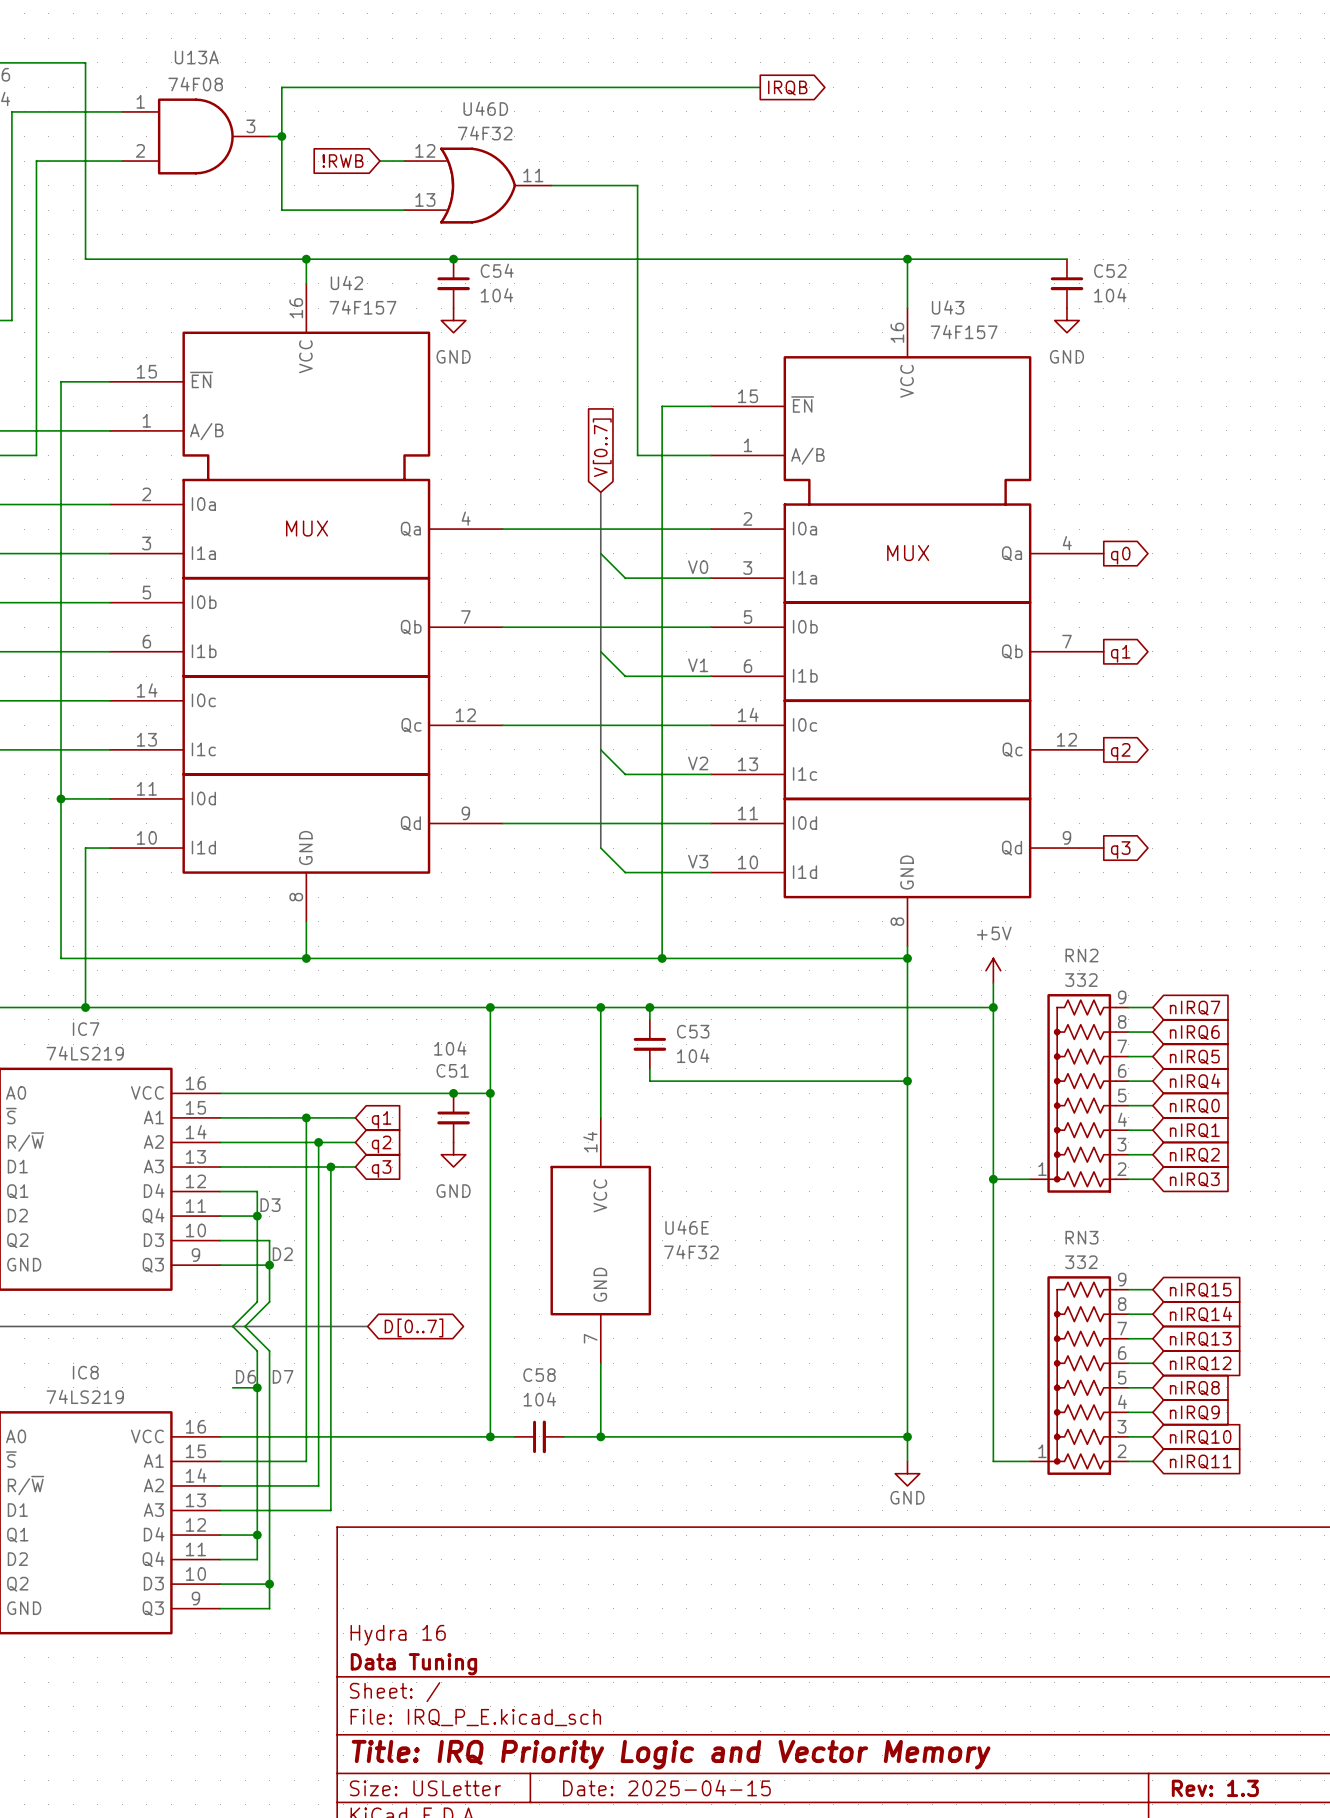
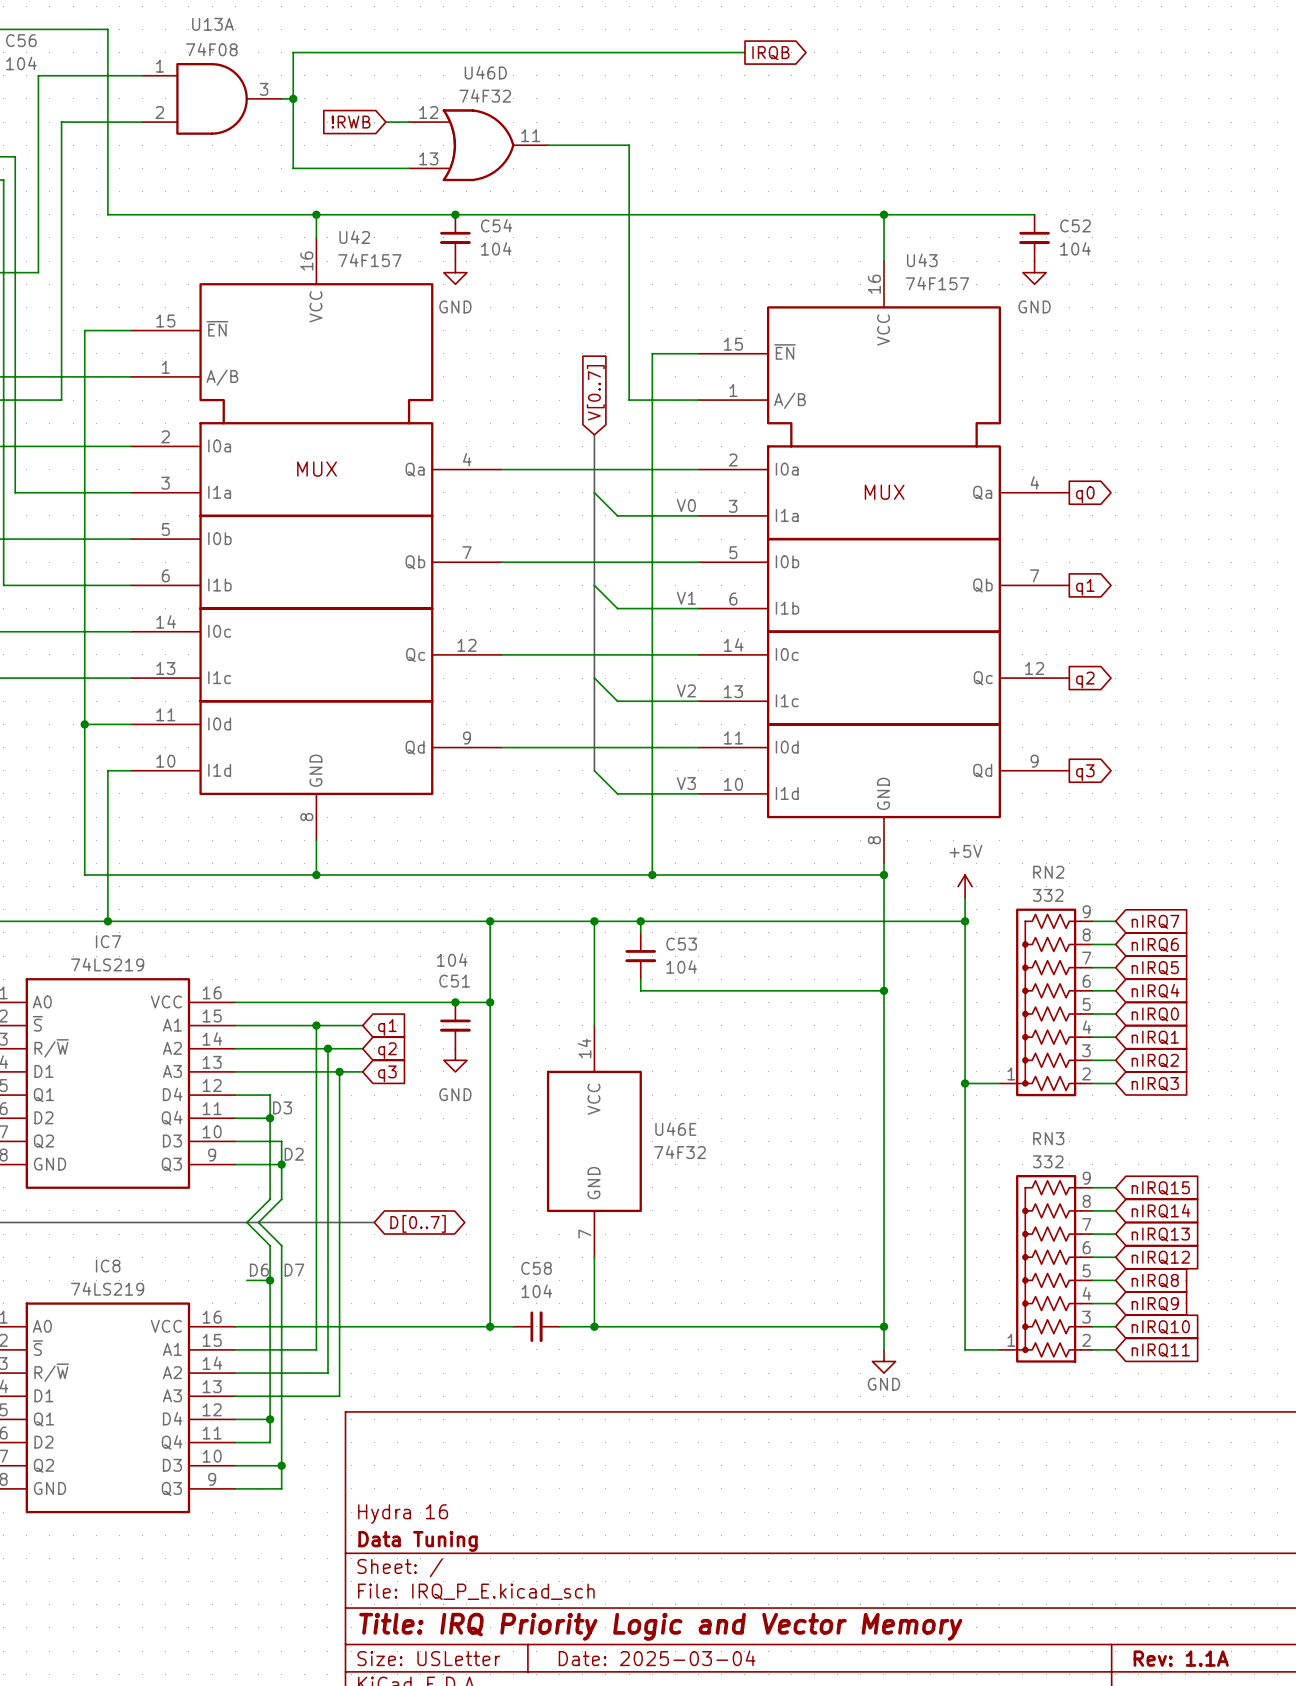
title block: Date: 2025-04-15 (666, 1788) -> Date: 2025-03-04 (657, 1658)
title block: Rev: 1.3 (1215, 1788) -> Rev: 1.1A (1181, 1658)

